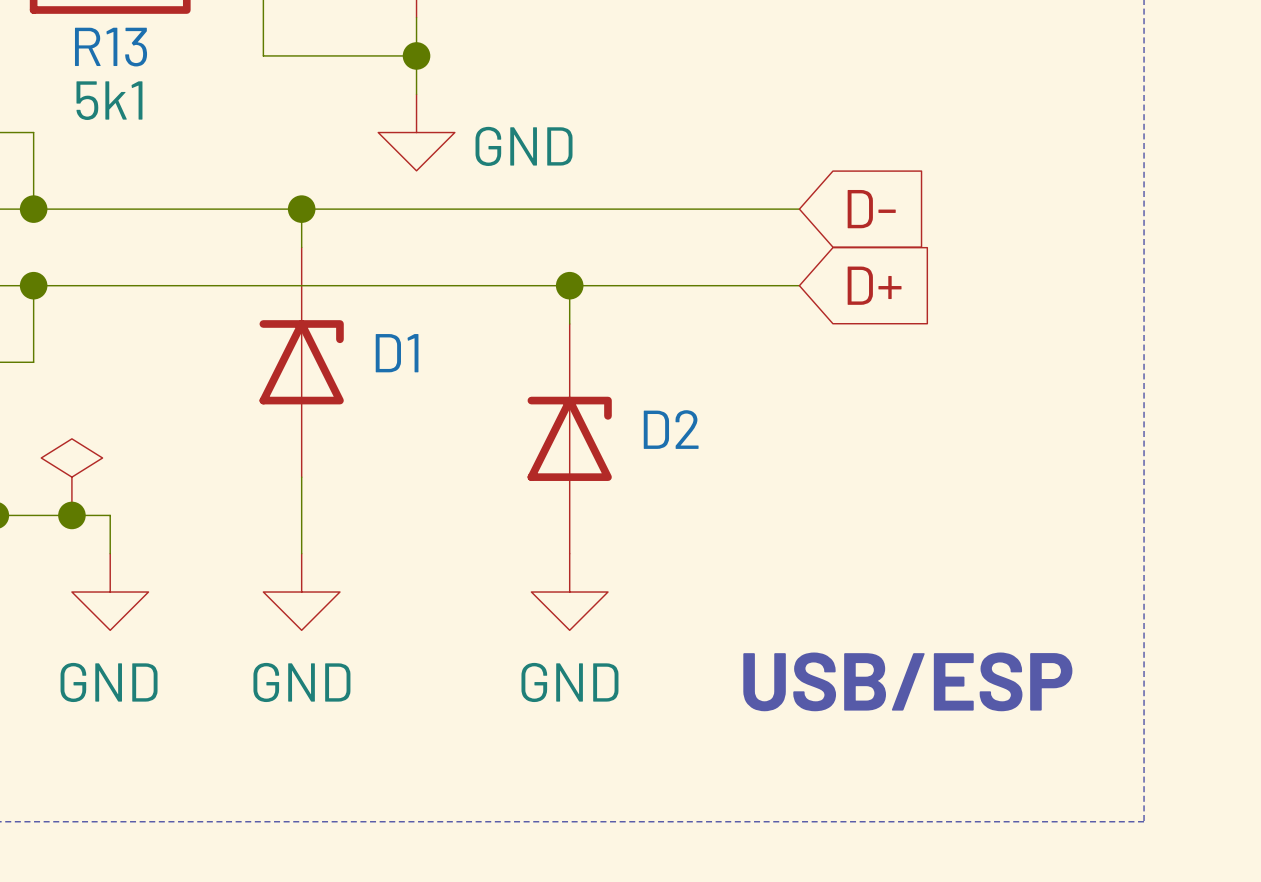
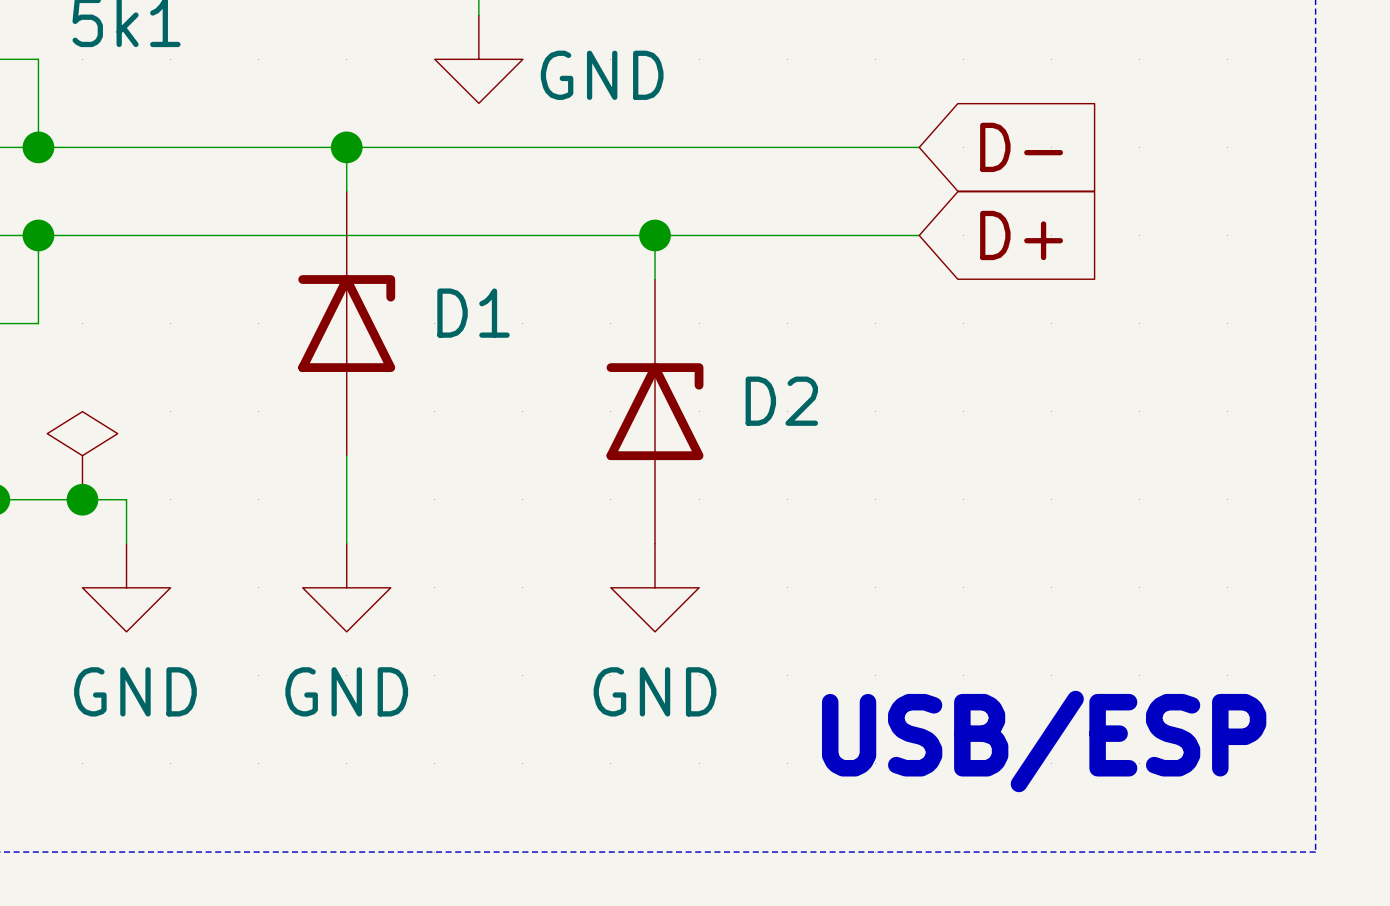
text position: USB/ESP (907, 681) -> USB/ESP (1044, 741)

